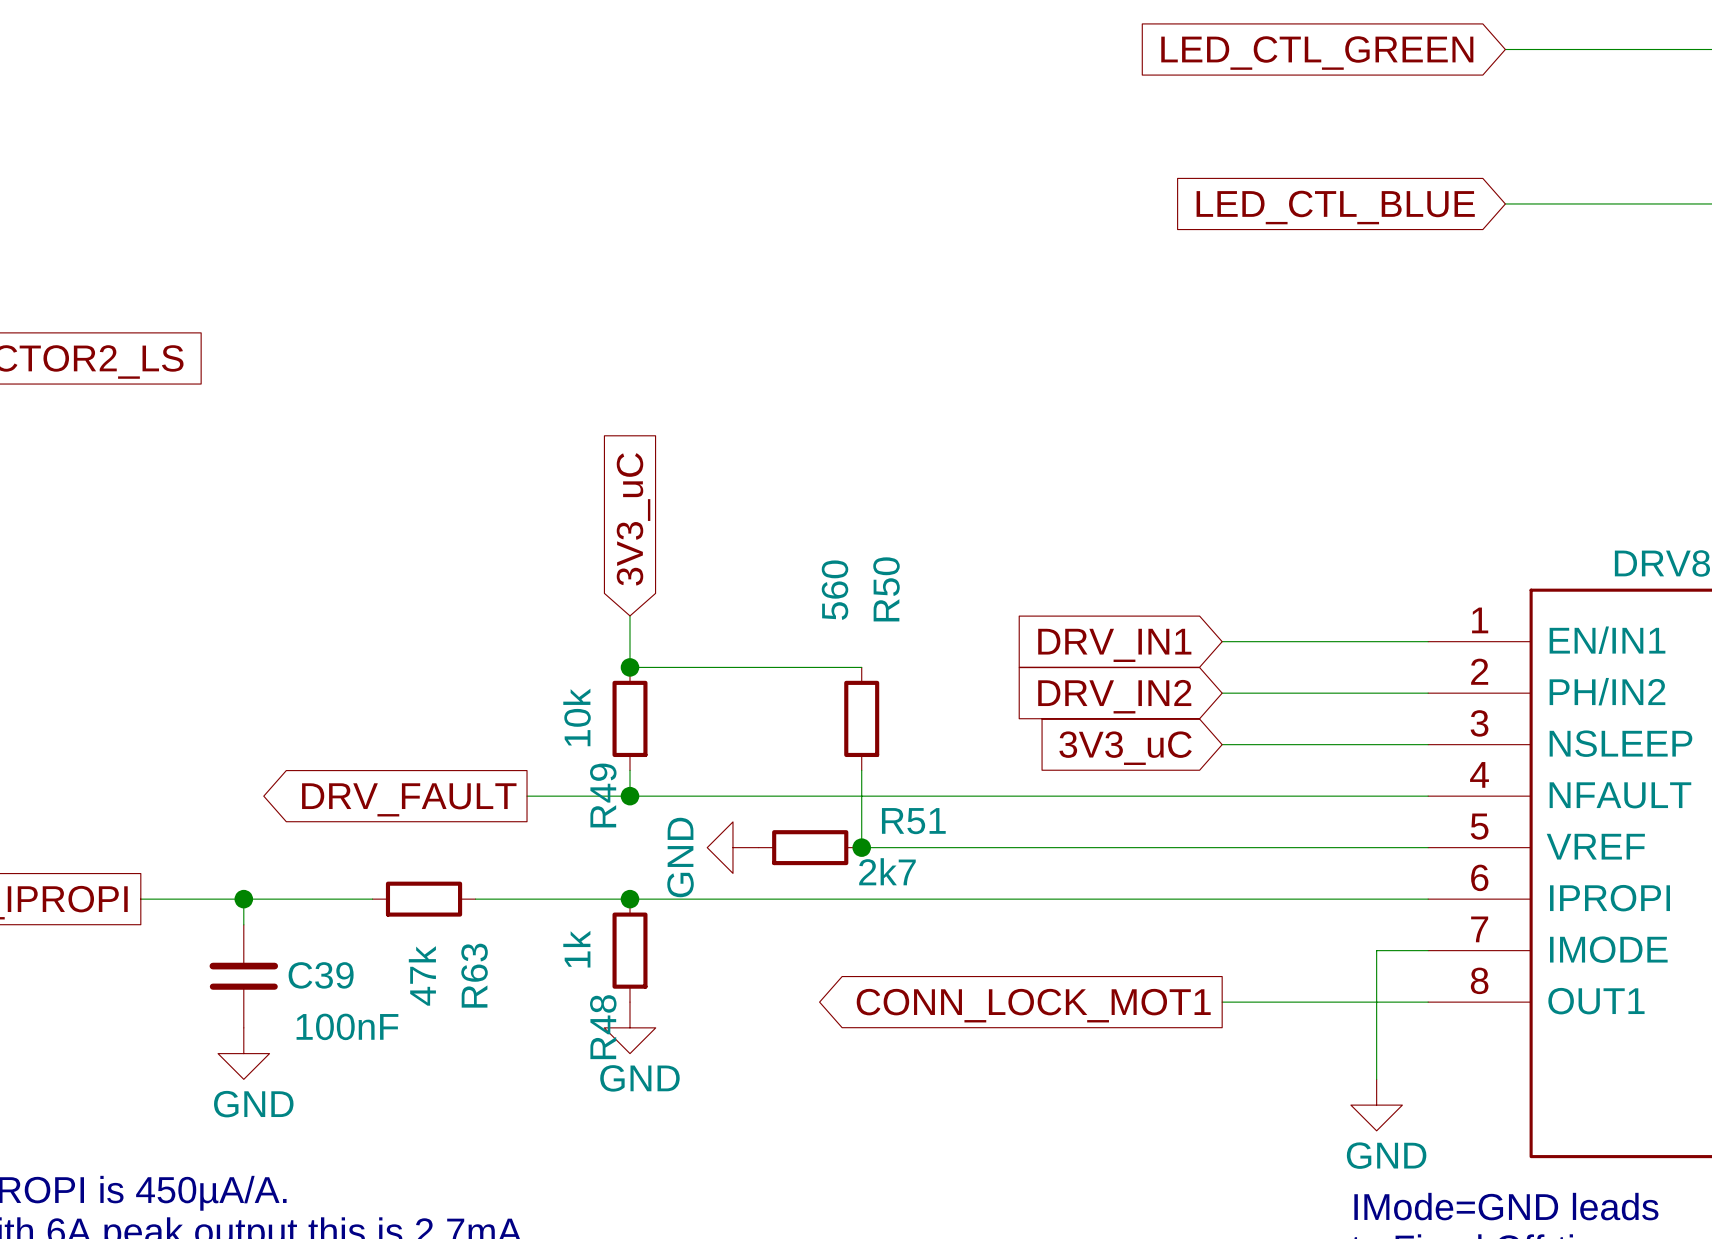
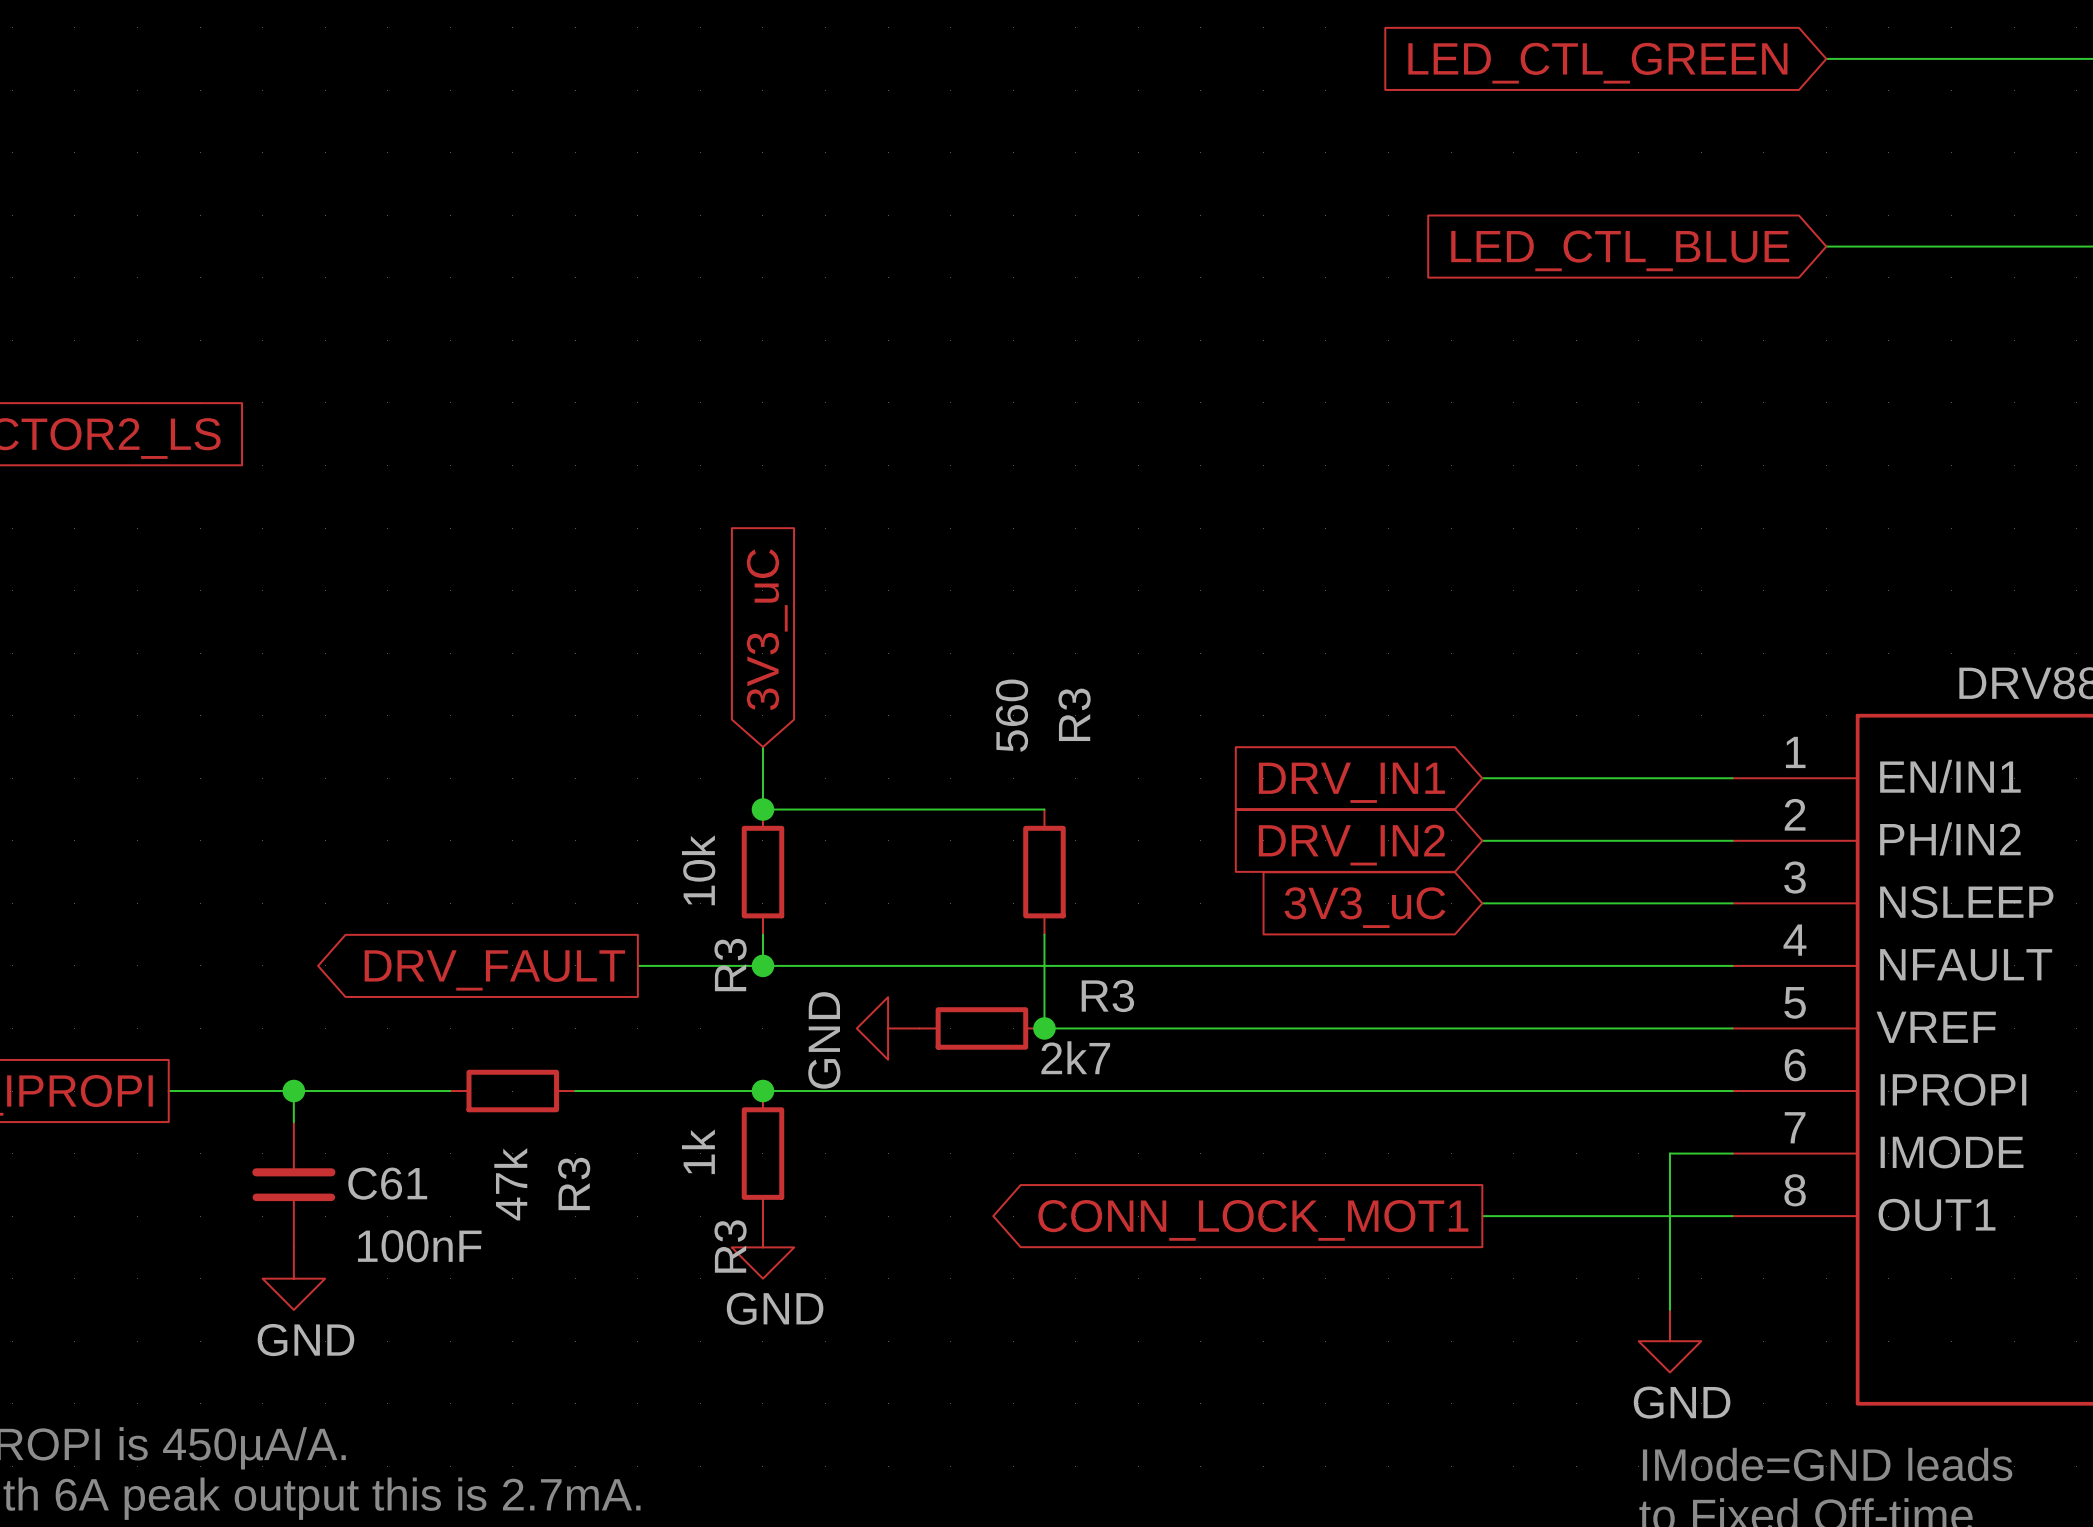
R50 name: R50 (886, 589) -> R3 (1074, 714)
R49 name: R49 (603, 795) -> R3 (730, 965)
R51 name: R51 (913, 821) -> R3 (1107, 996)
C39 name: C39 (321, 975) -> C61 (387, 1183)
R63 name: R63 (474, 975) -> R3 (574, 1183)
R48 name: R48 (603, 1027) -> R3 (730, 1246)

